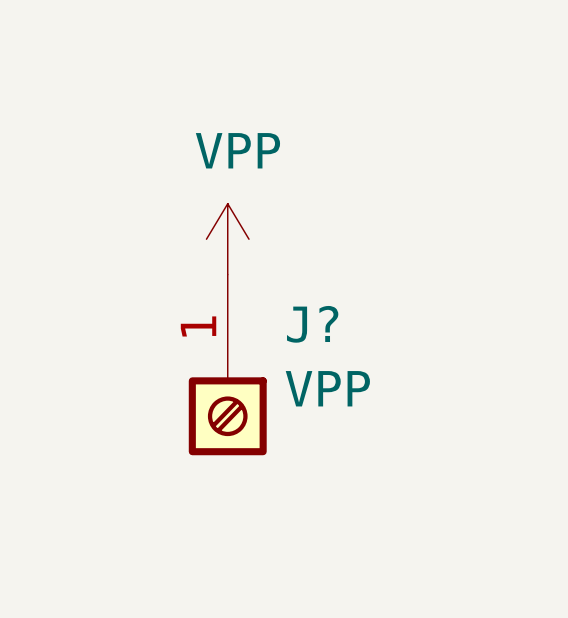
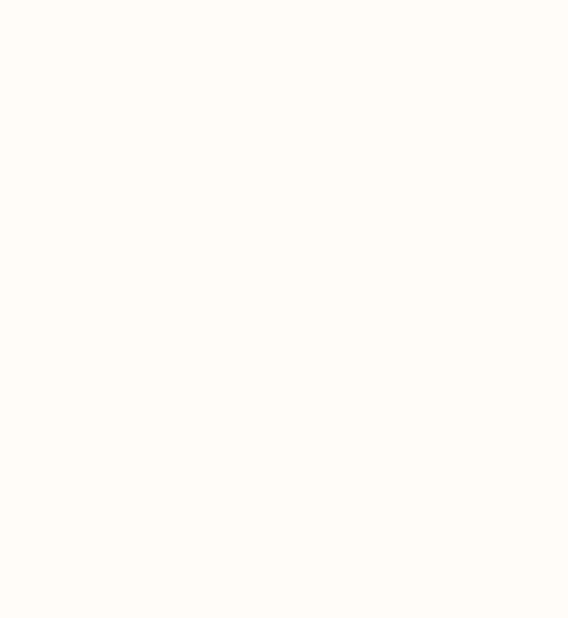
power symbol: VPP (227, 239) -> none
J?: VPP (227, 364) -> none

